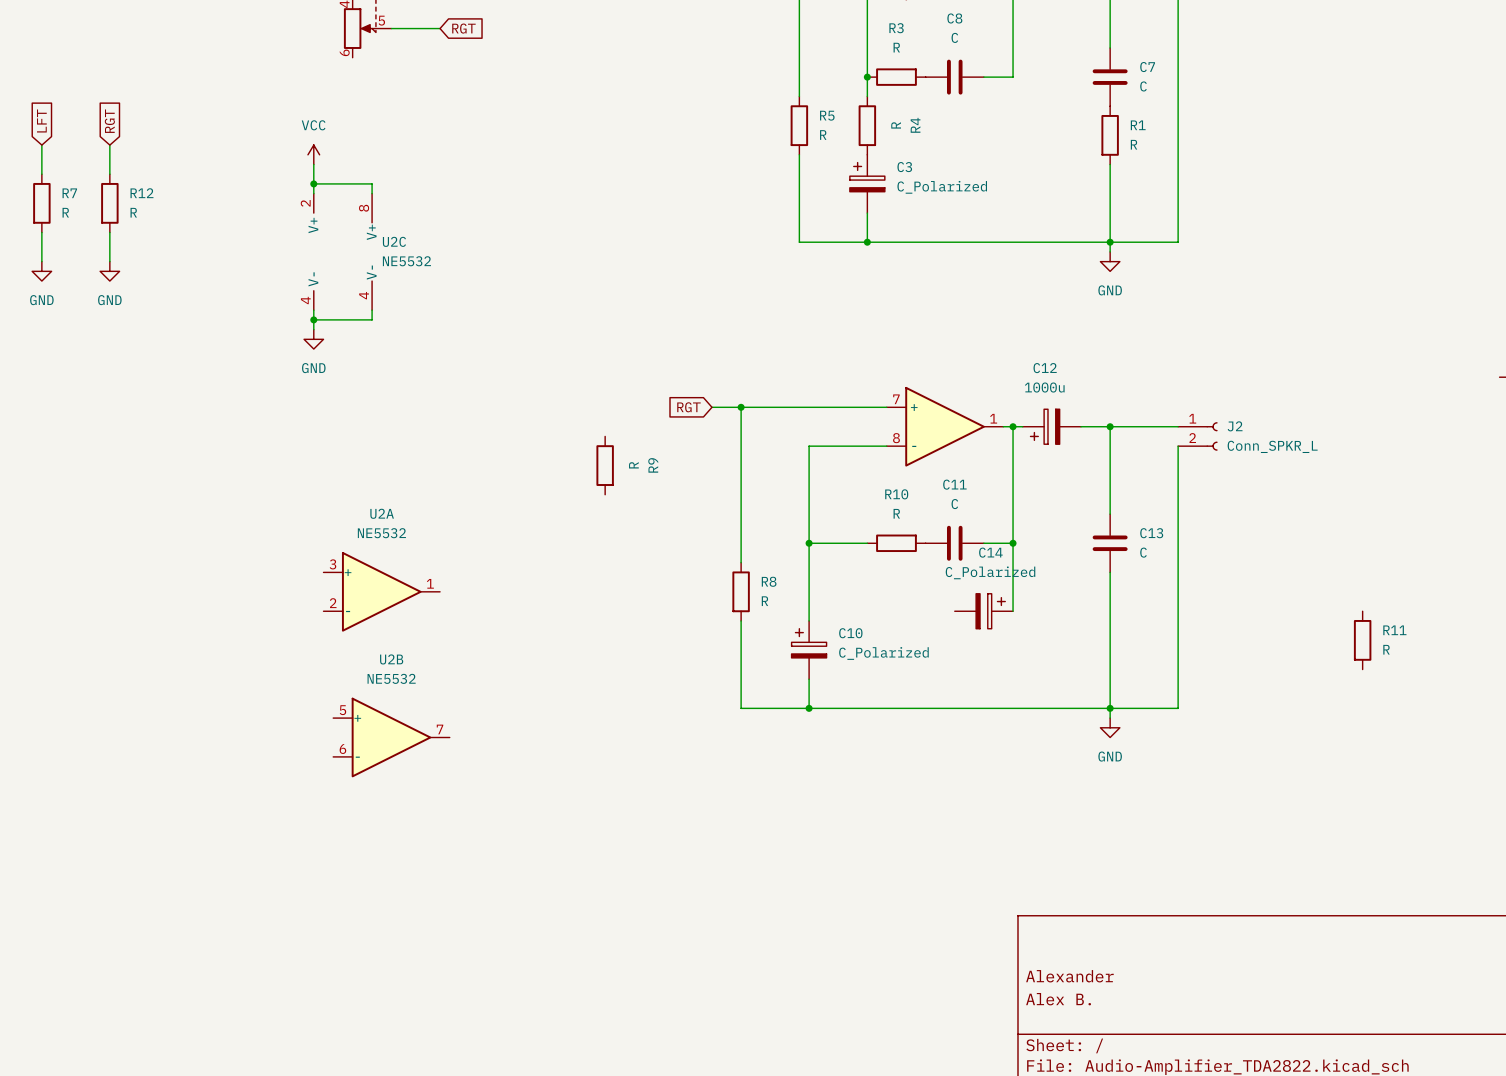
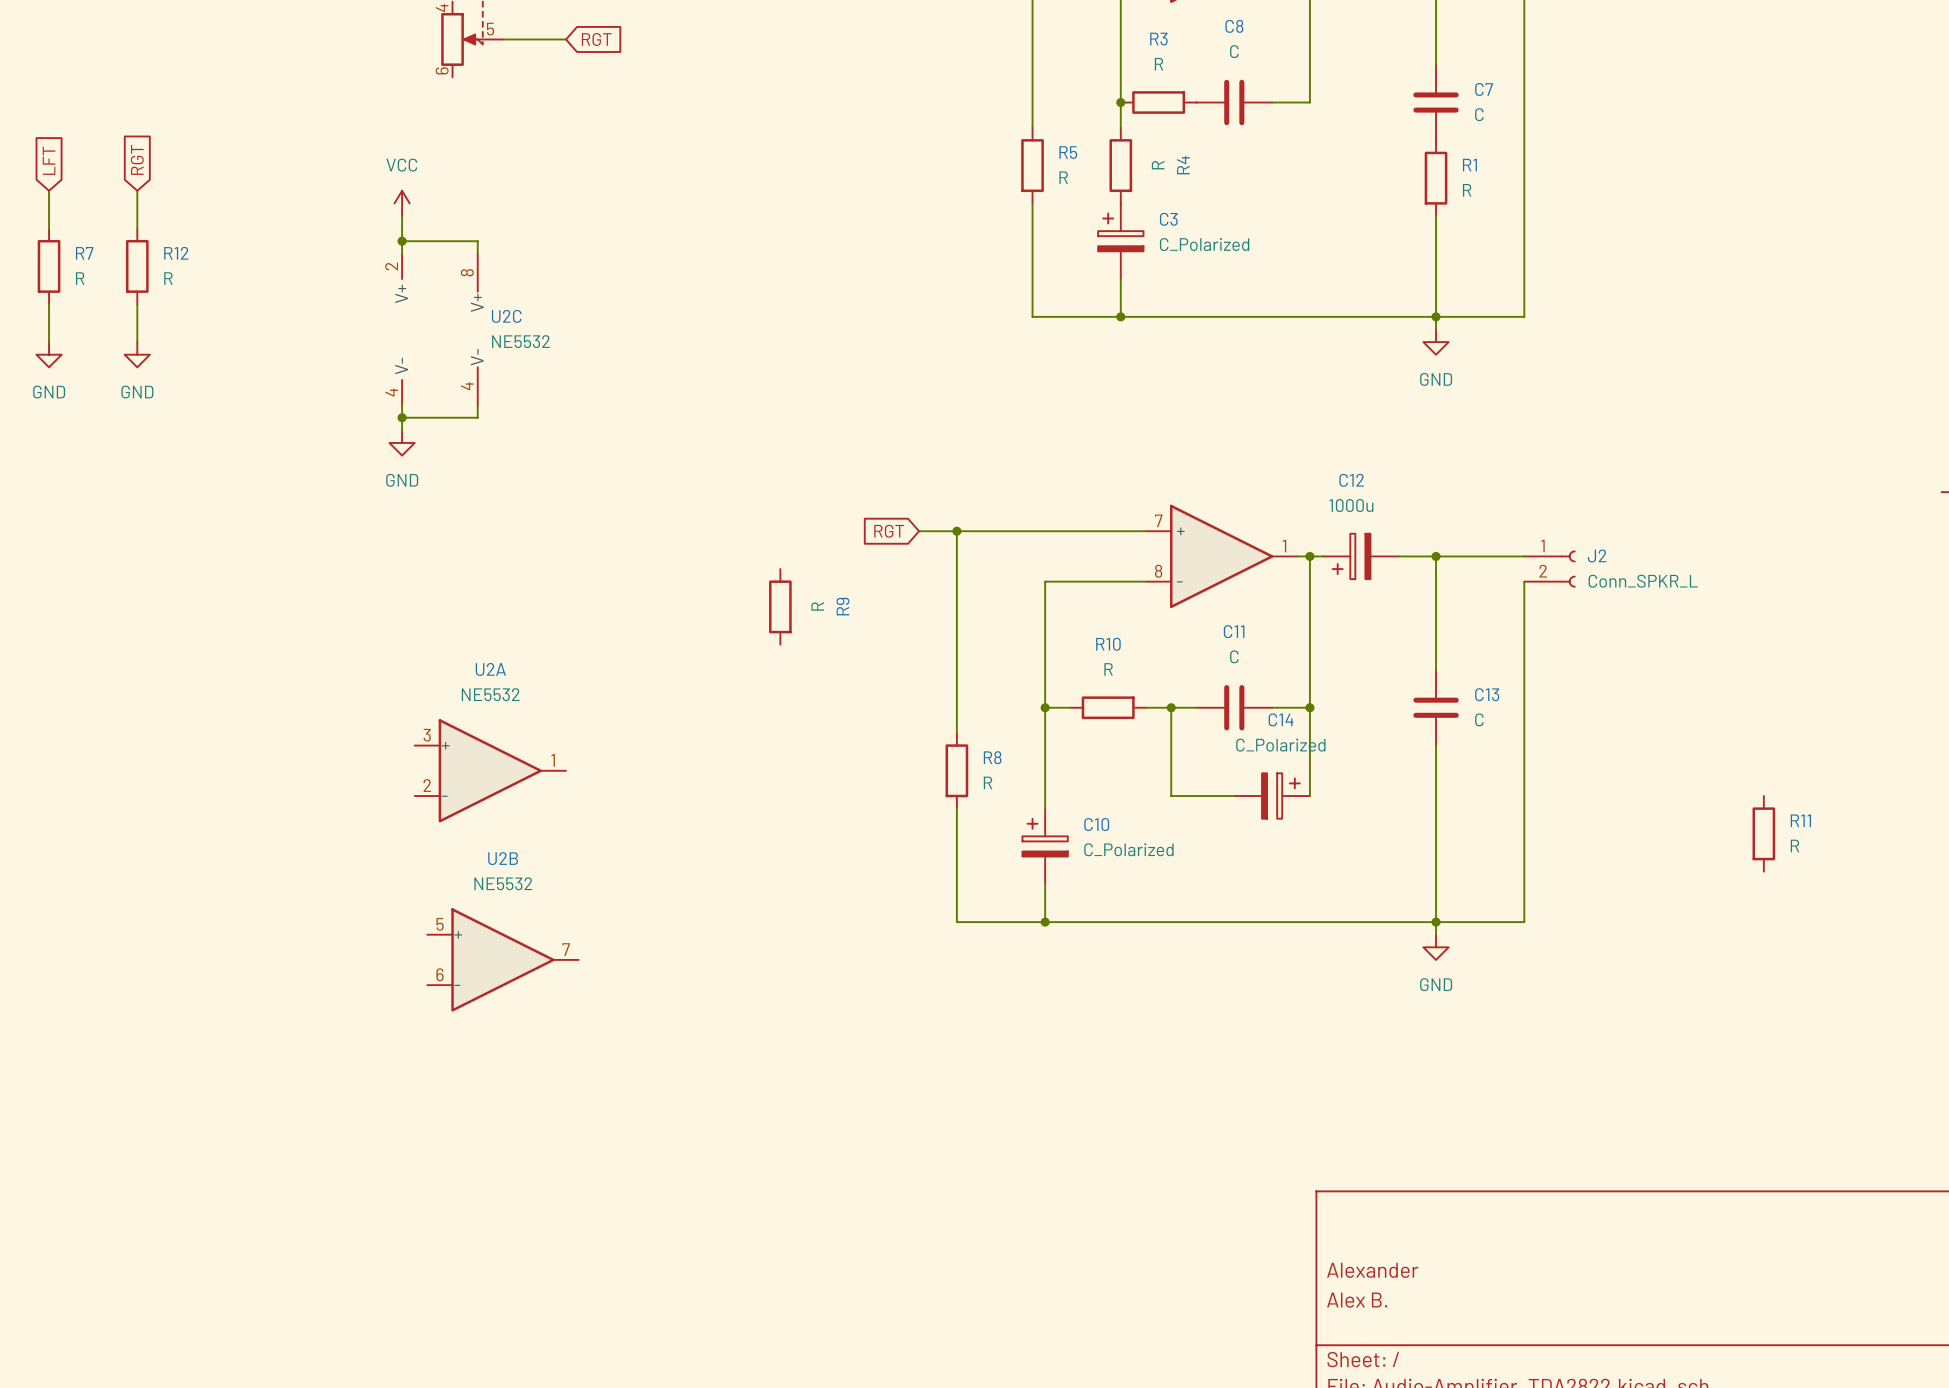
wire: (828, 543) (867, 543) -> (1146, 707) (1196, 707)
R10 position: (896, 543) -> (1108, 707)
wire: none -> (1171, 707) (1171, 796) (1234, 796)
junction: none -> (1171, 707)

